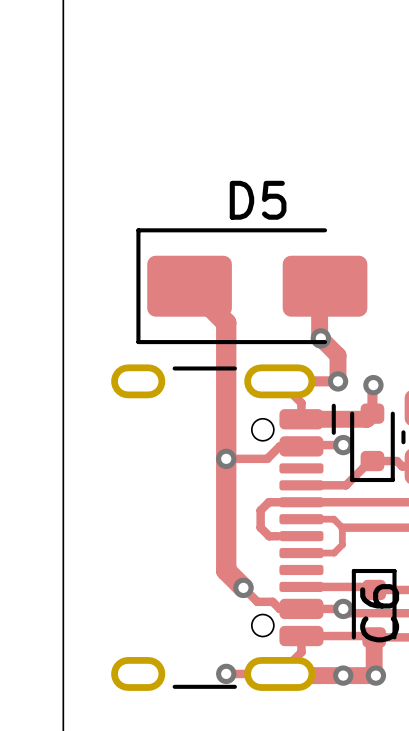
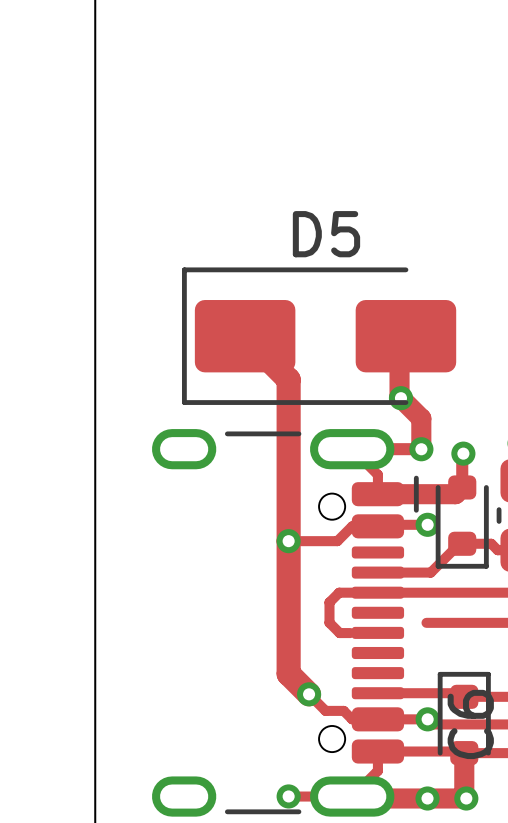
track: (305, 519) (333, 519) (342, 527) (342, 544) (334, 553) (305, 553) -> none

